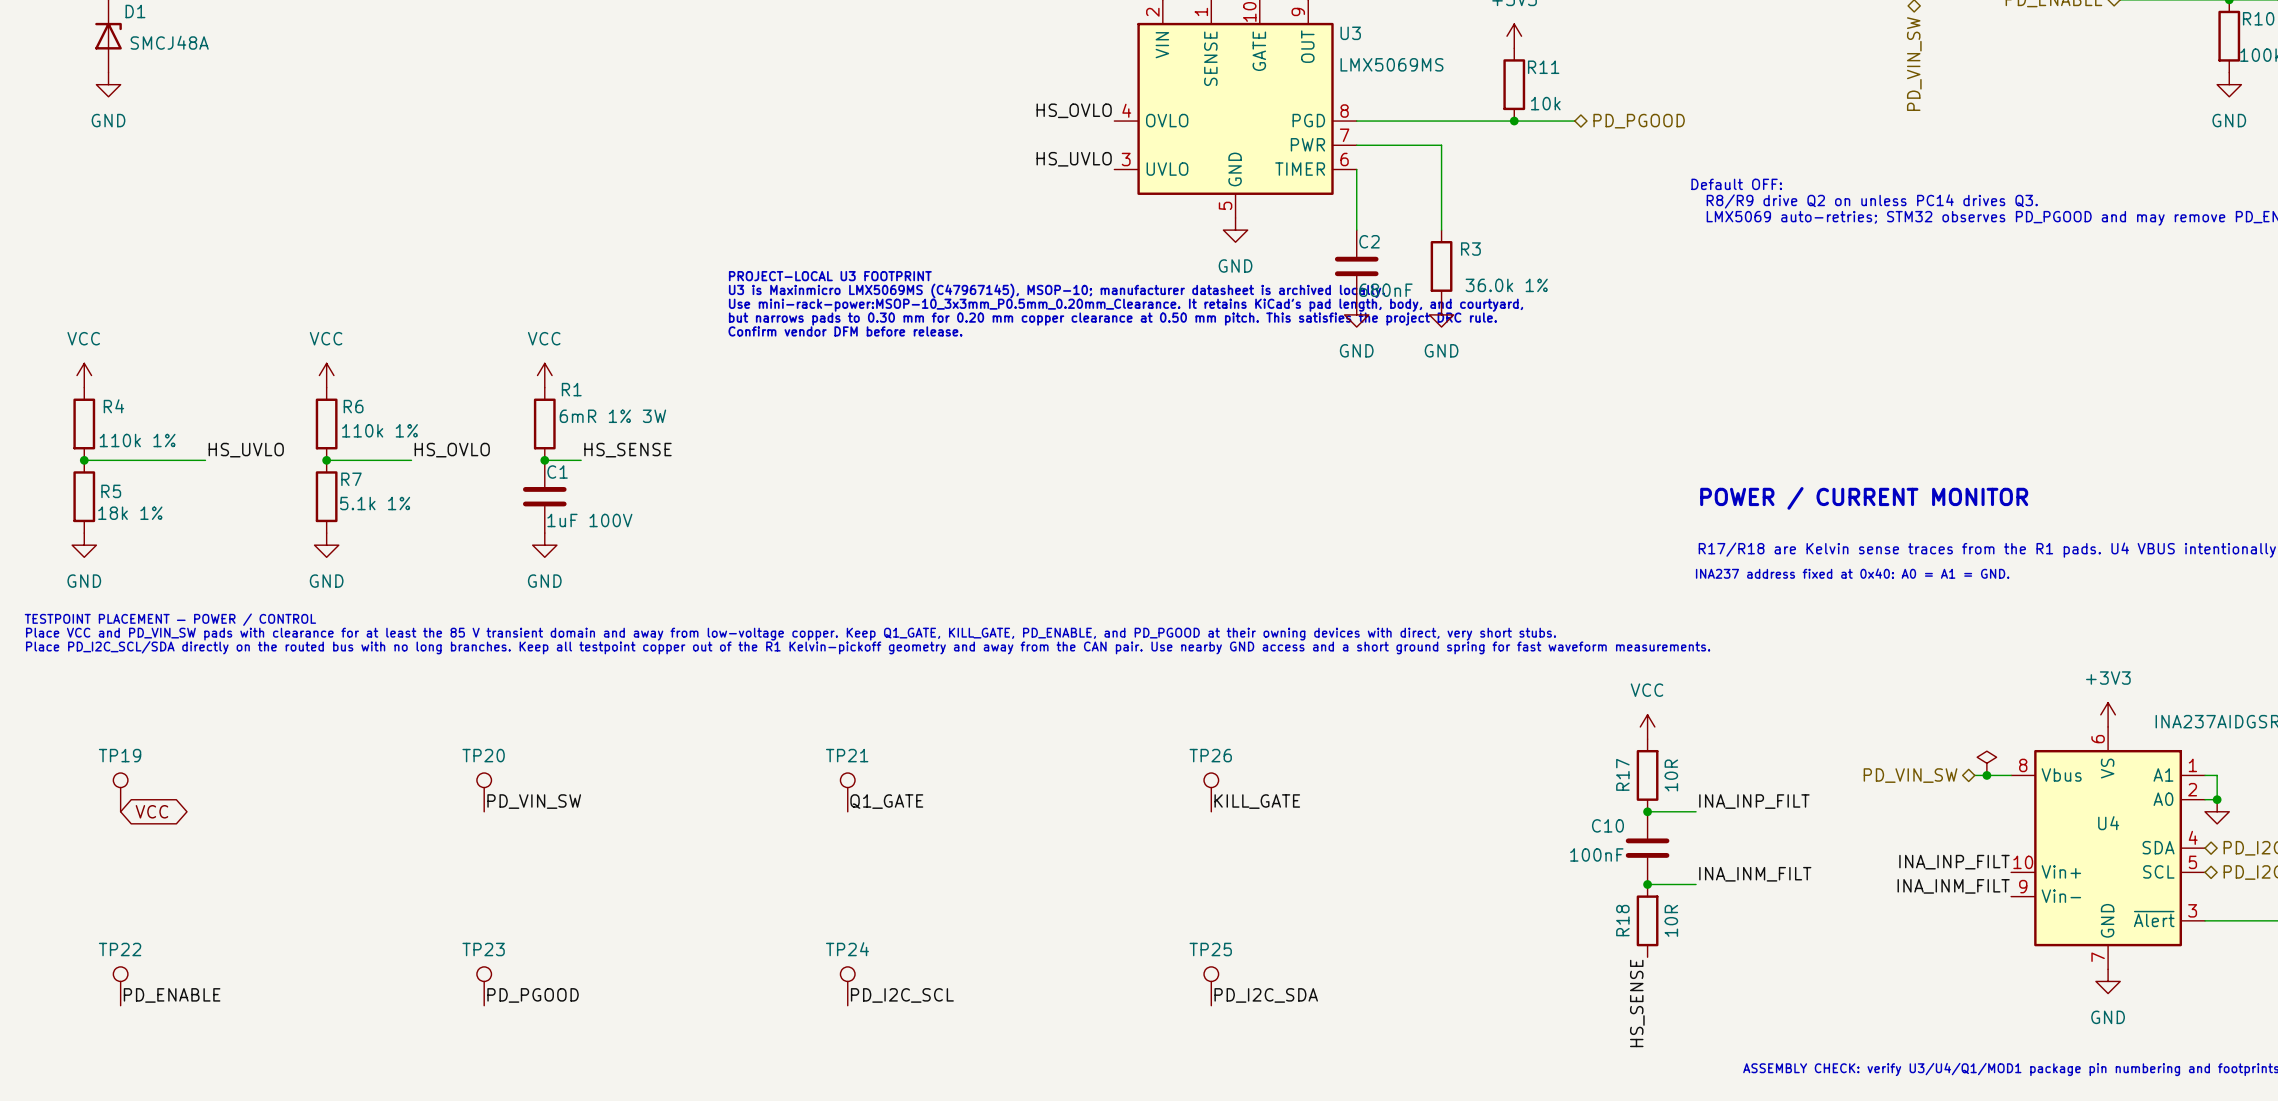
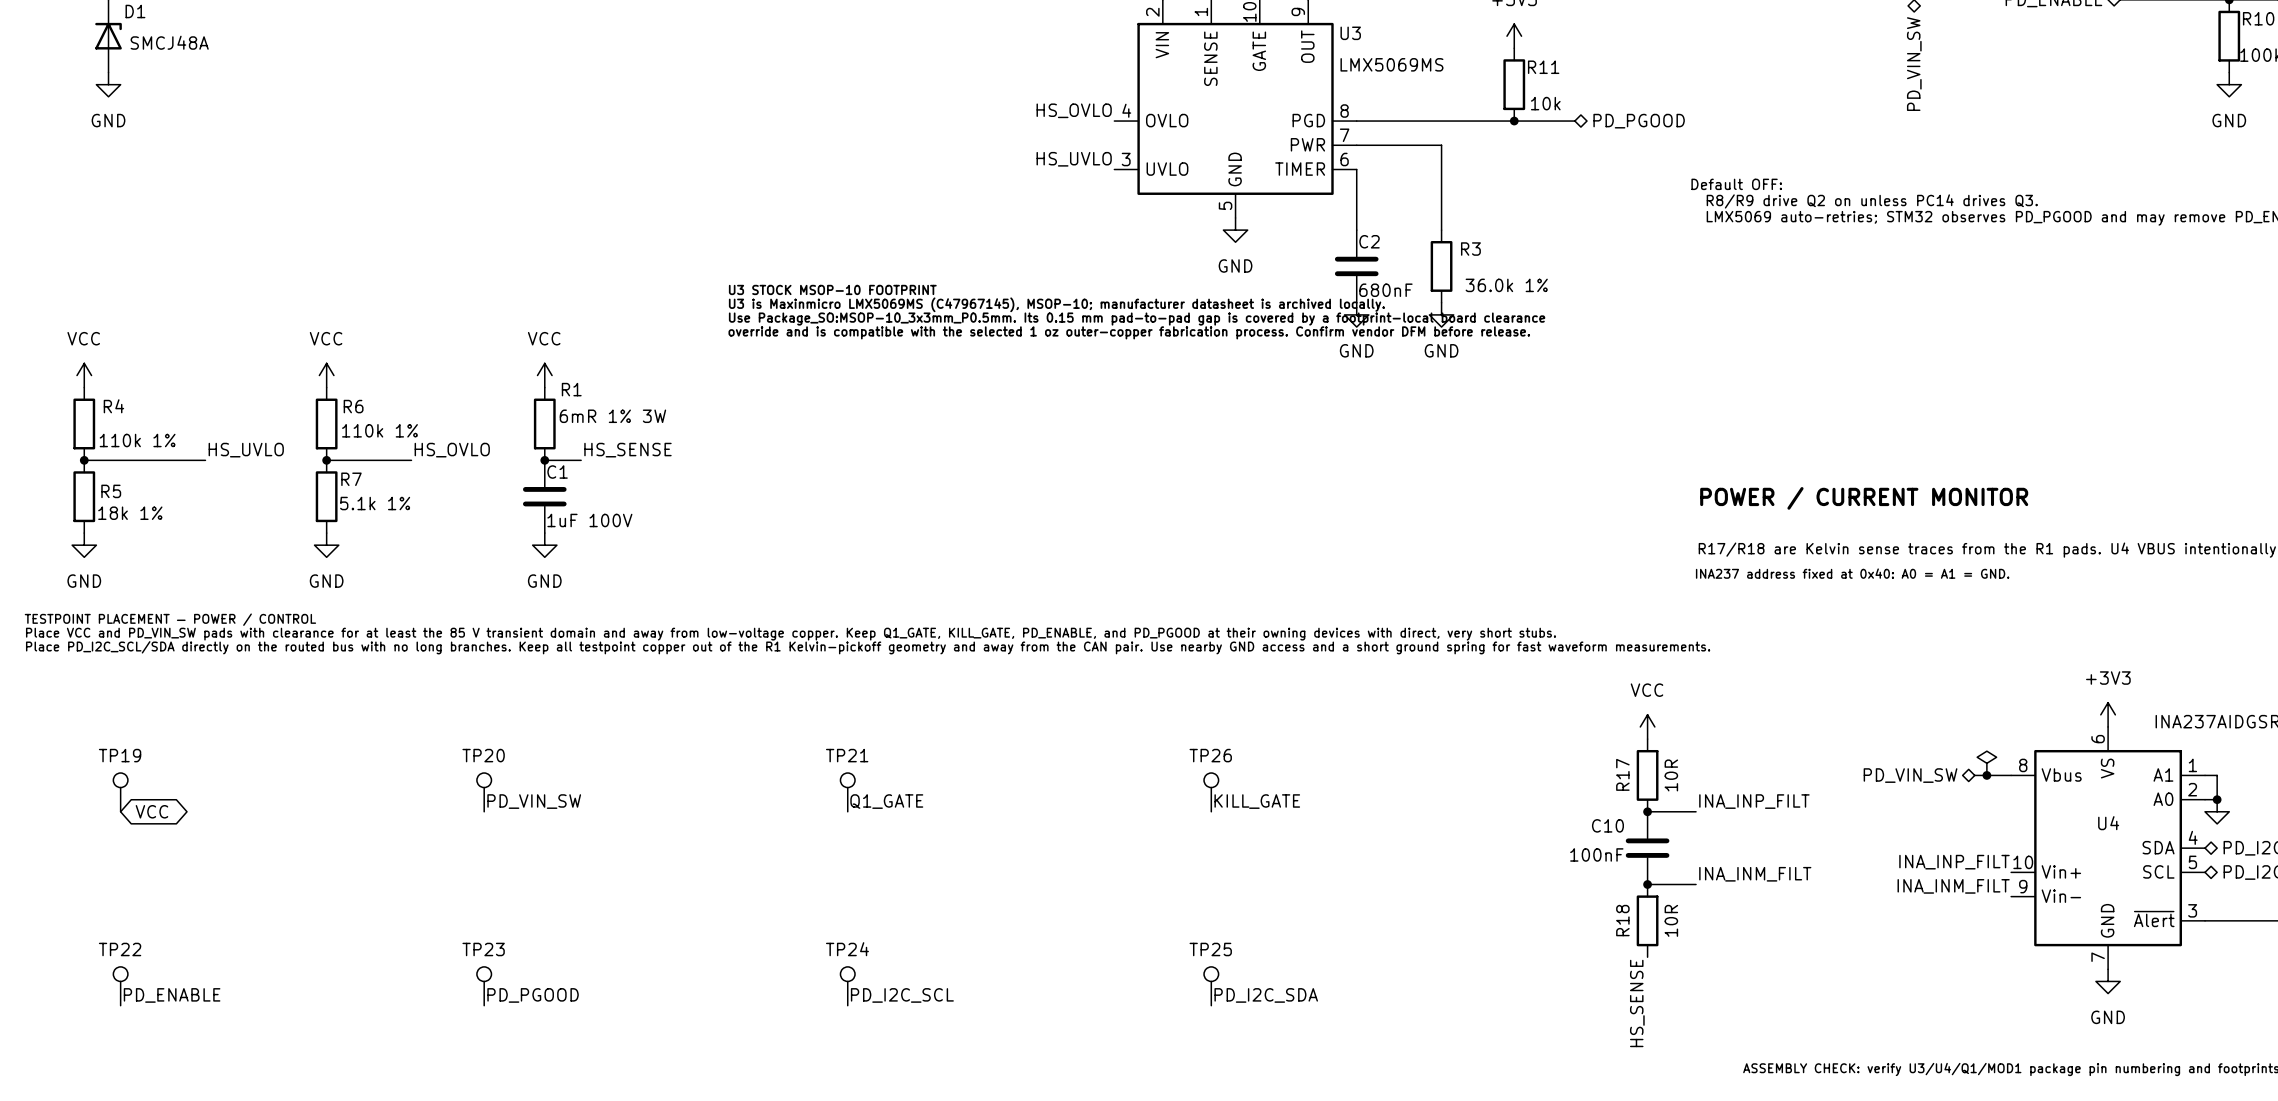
text: PROJECT-LOCAL U3 FOOTPRINT (830, 276) -> none
text: U3 is Maxinmicro LMX5069MS (C47967145), MSOP-10; manufacturer datasheet is archived locally. (1056, 290) -> U3 STOCK MSOP-10 FOOTPRINT (832, 289)
text: Use mini-rack-power:MSOP-10_3x3mm_P0.5mm_0.20mm_Clearance. It retains KiCad's pad length, body, and courtyard, (1126, 305) -> U3 is Maxinmicro LMX5069MS (C47967145), MSOP-10; manufacturer datasheet is archived locally. (1056, 304)
text: but narrows pads to 0.30 mm for 0.20 mm copper clearance at 0.50 mm pitch. This satisfies the project DRC rule. (1112, 319) -> Use Package_SO:MSOP-10_3x3mm_P0.5mm. Its 0.15 mm pad-to-pad gap is covered by a footprint-local board clearance (1137, 319)
text: Confirm vendor DFM before release. (845, 331) -> override and is compatible with the selected 1 oz outer-copper fabrication process. Confirm vendor DFM before release. (1129, 332)

